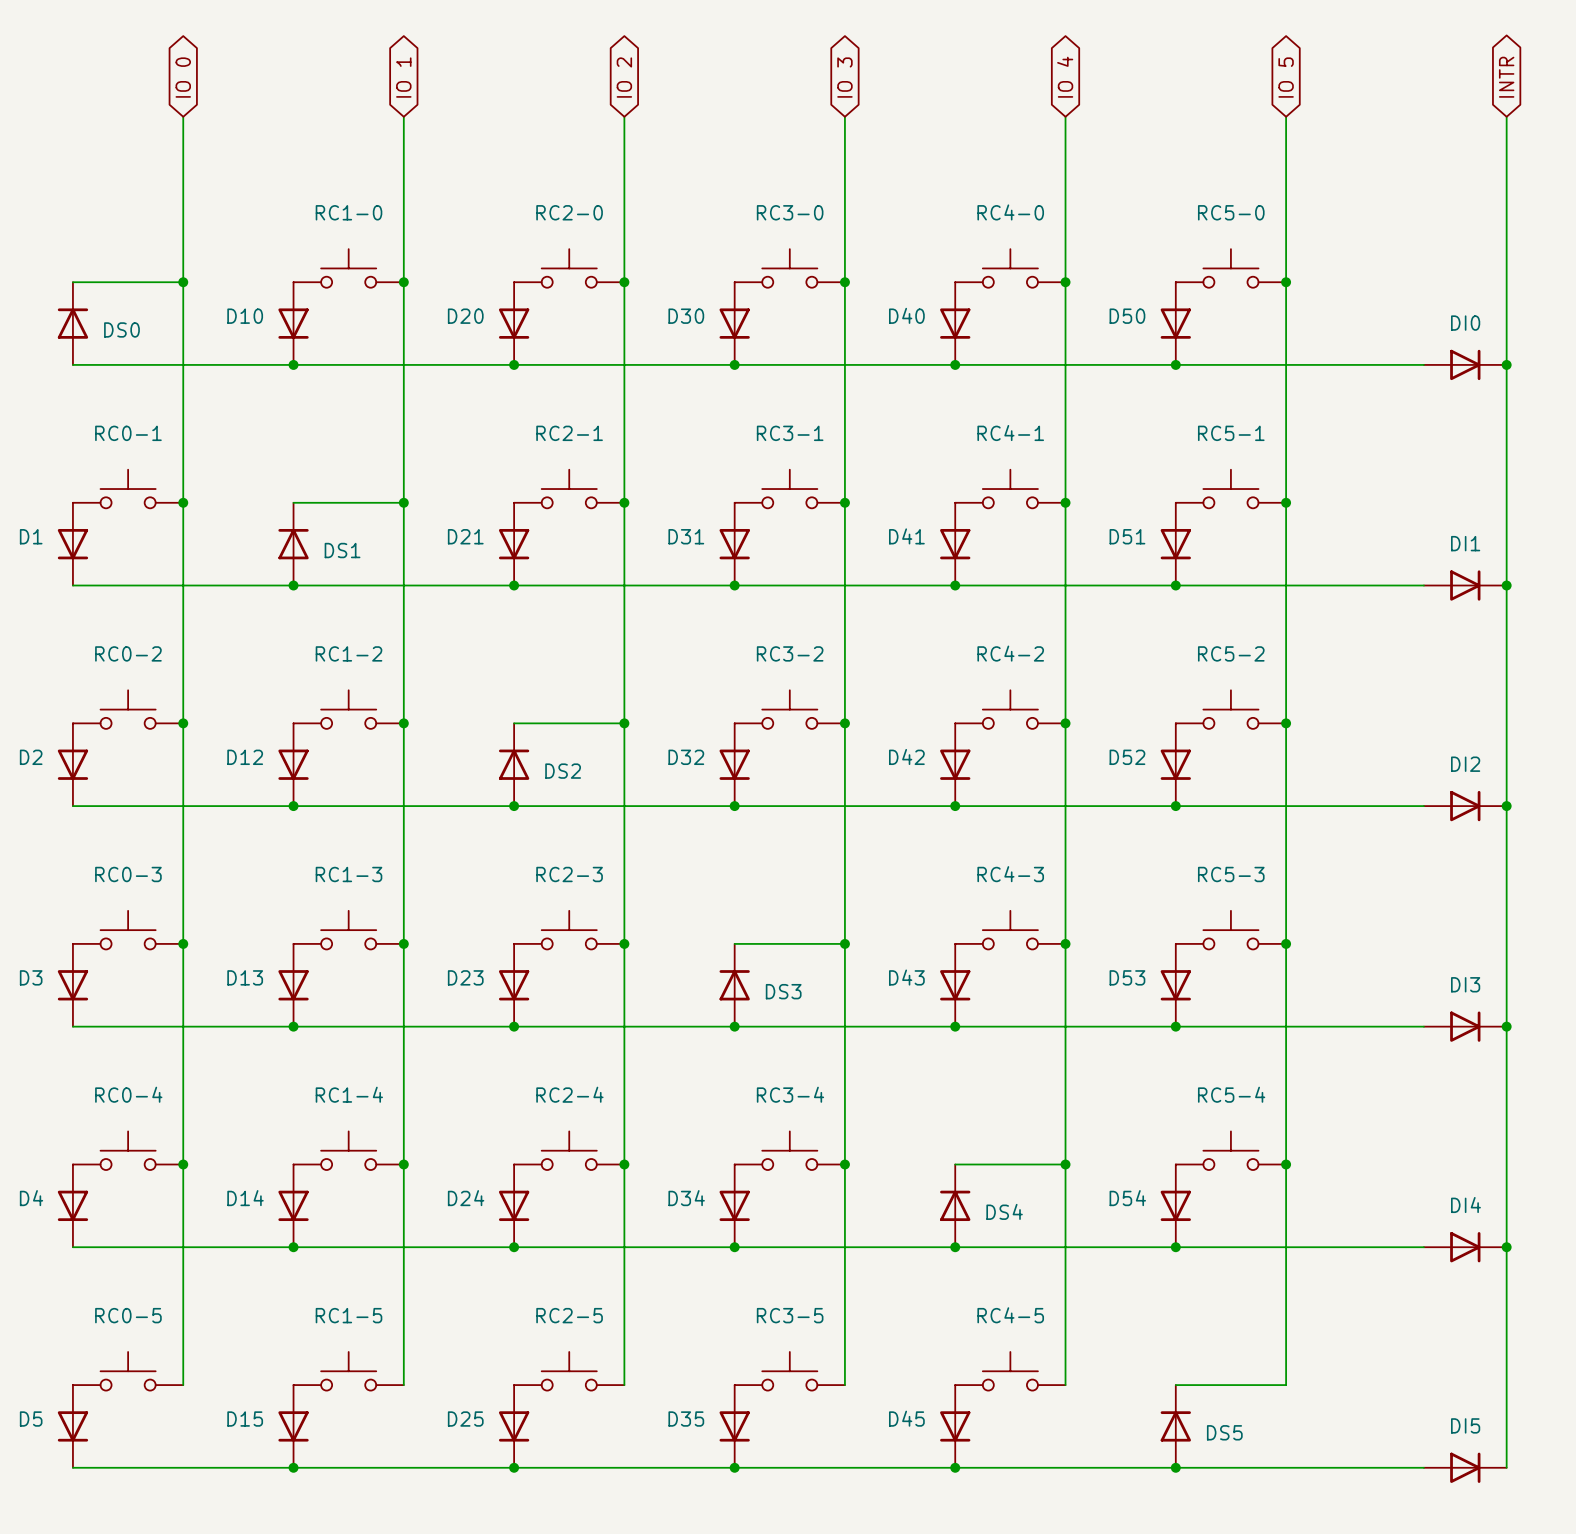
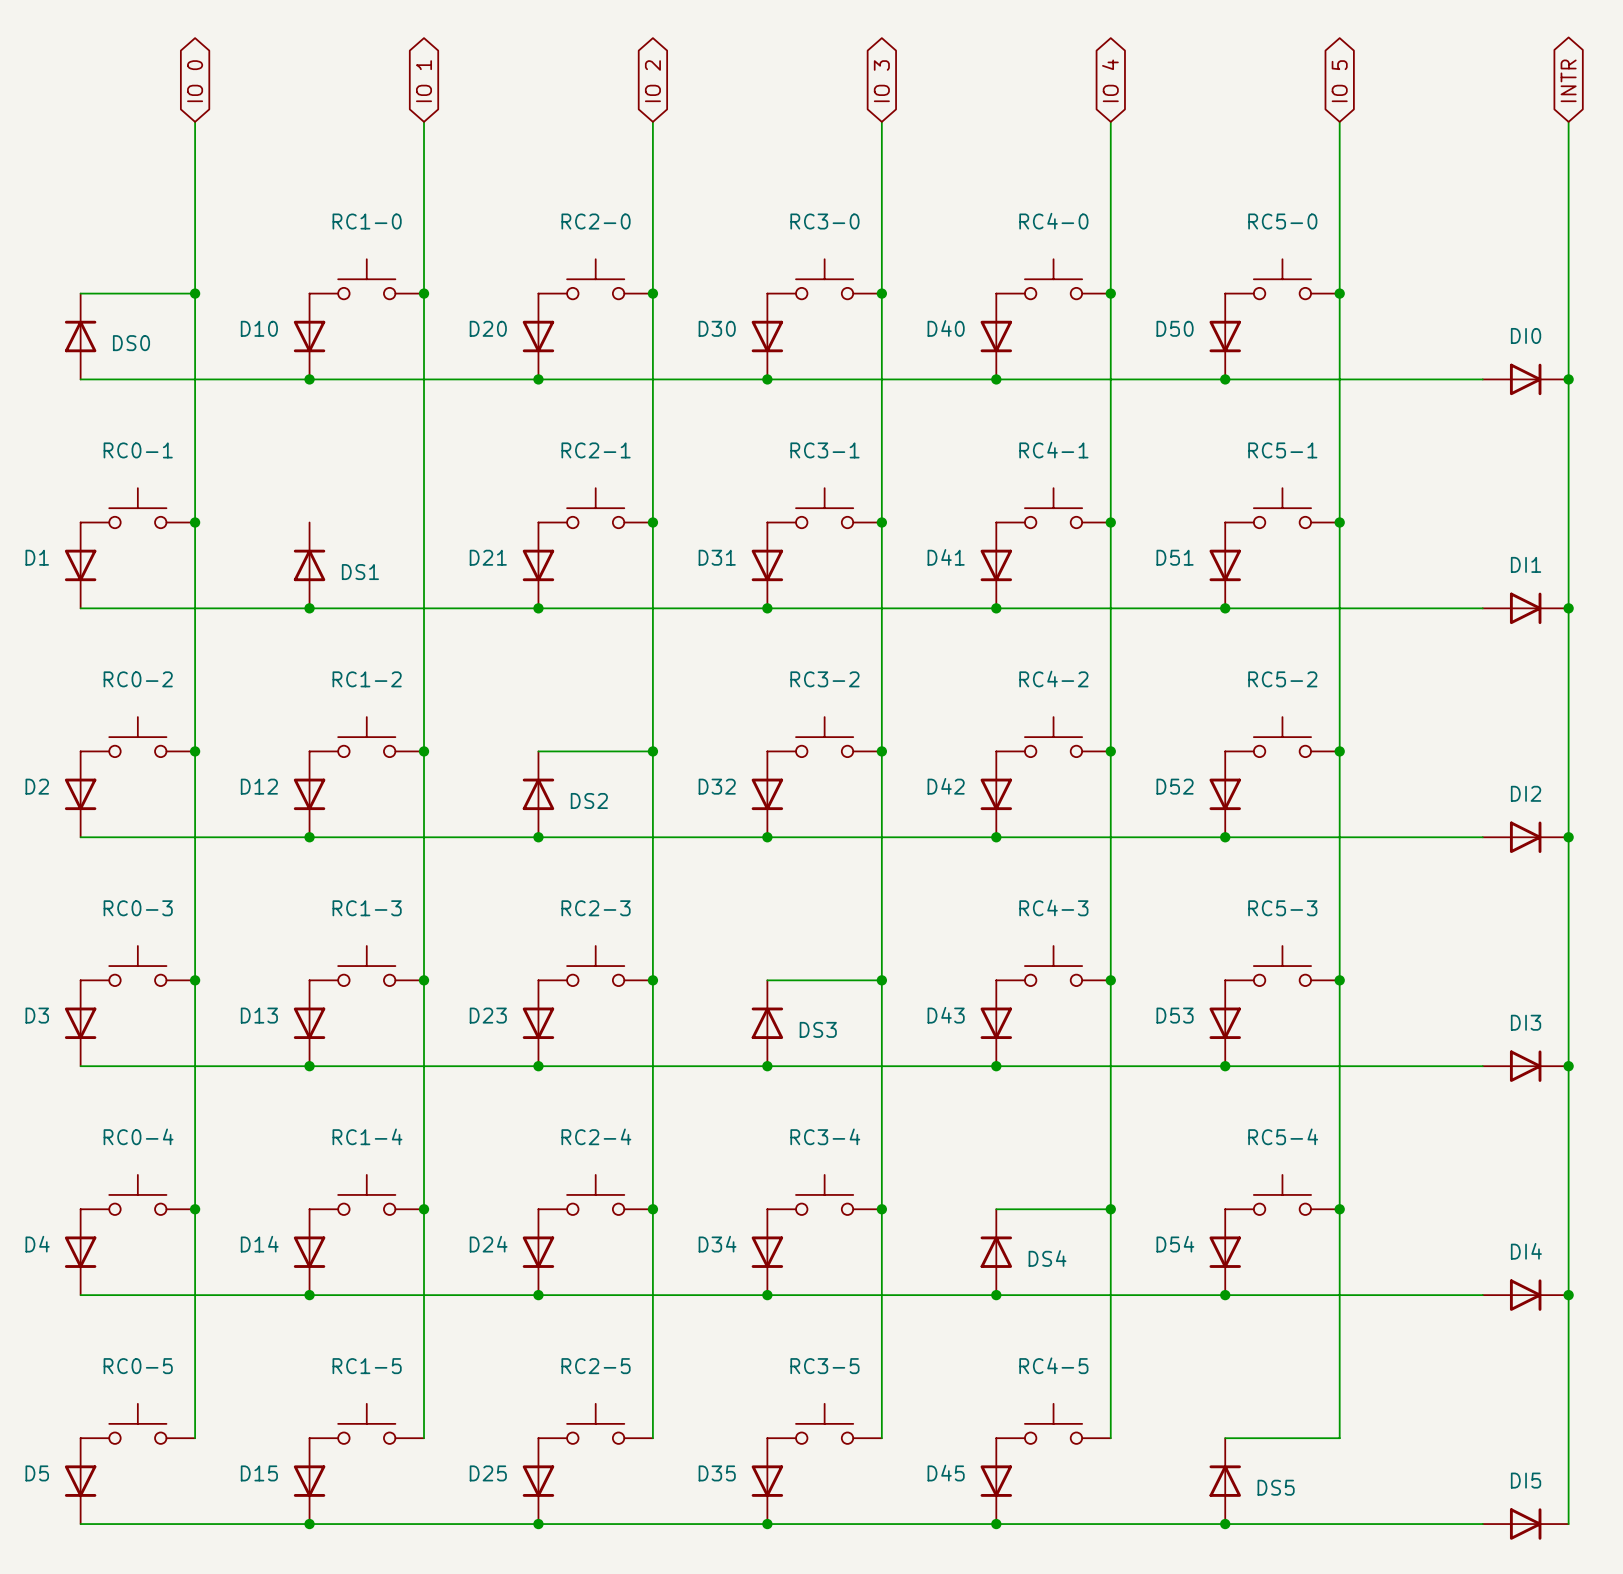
wire: (293, 502) (403, 502) -> none
junction: (403, 502) -> none

